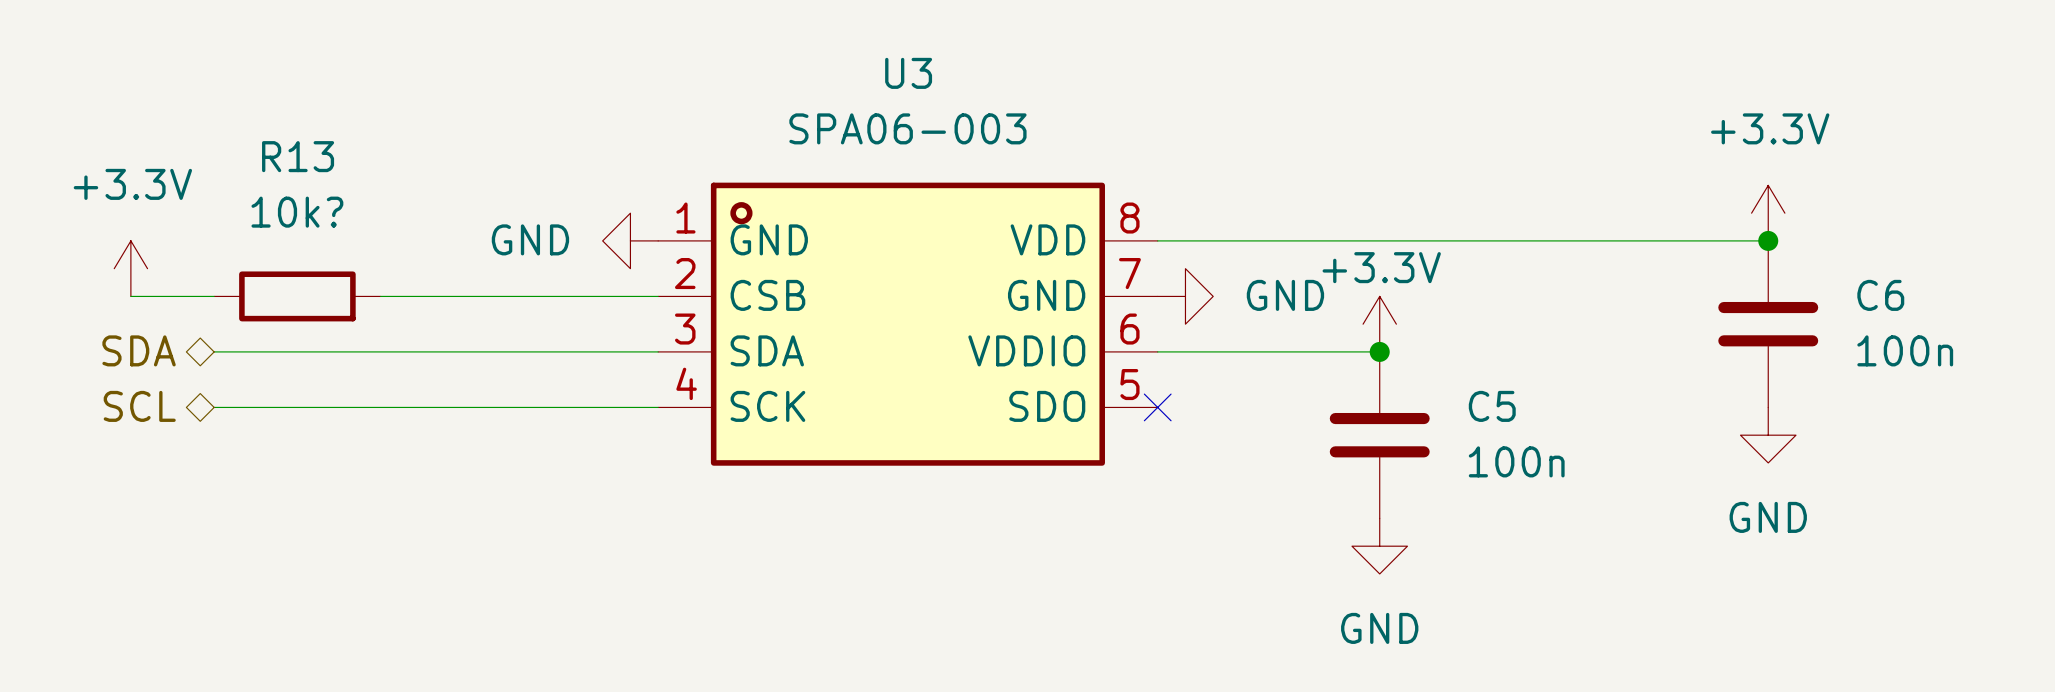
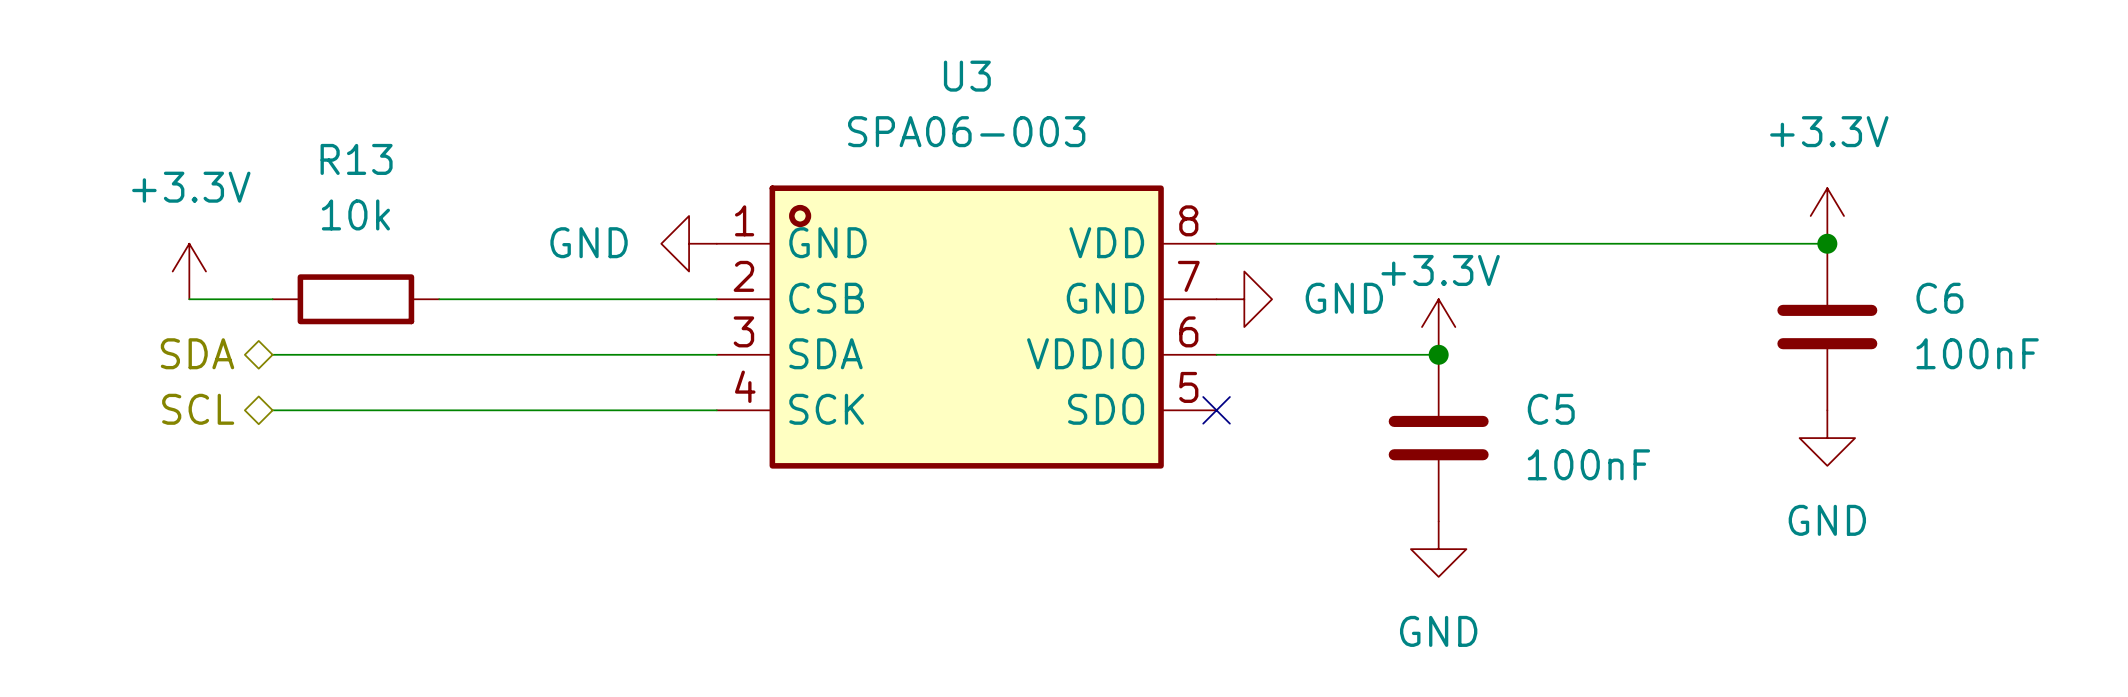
R13 value: 10k? (297, 212) -> 10k (355, 214)
C6 value: 100n (1905, 350) -> 100nF (1977, 353)
C5 value: 100n (1516, 461) -> 100nF (1588, 464)

